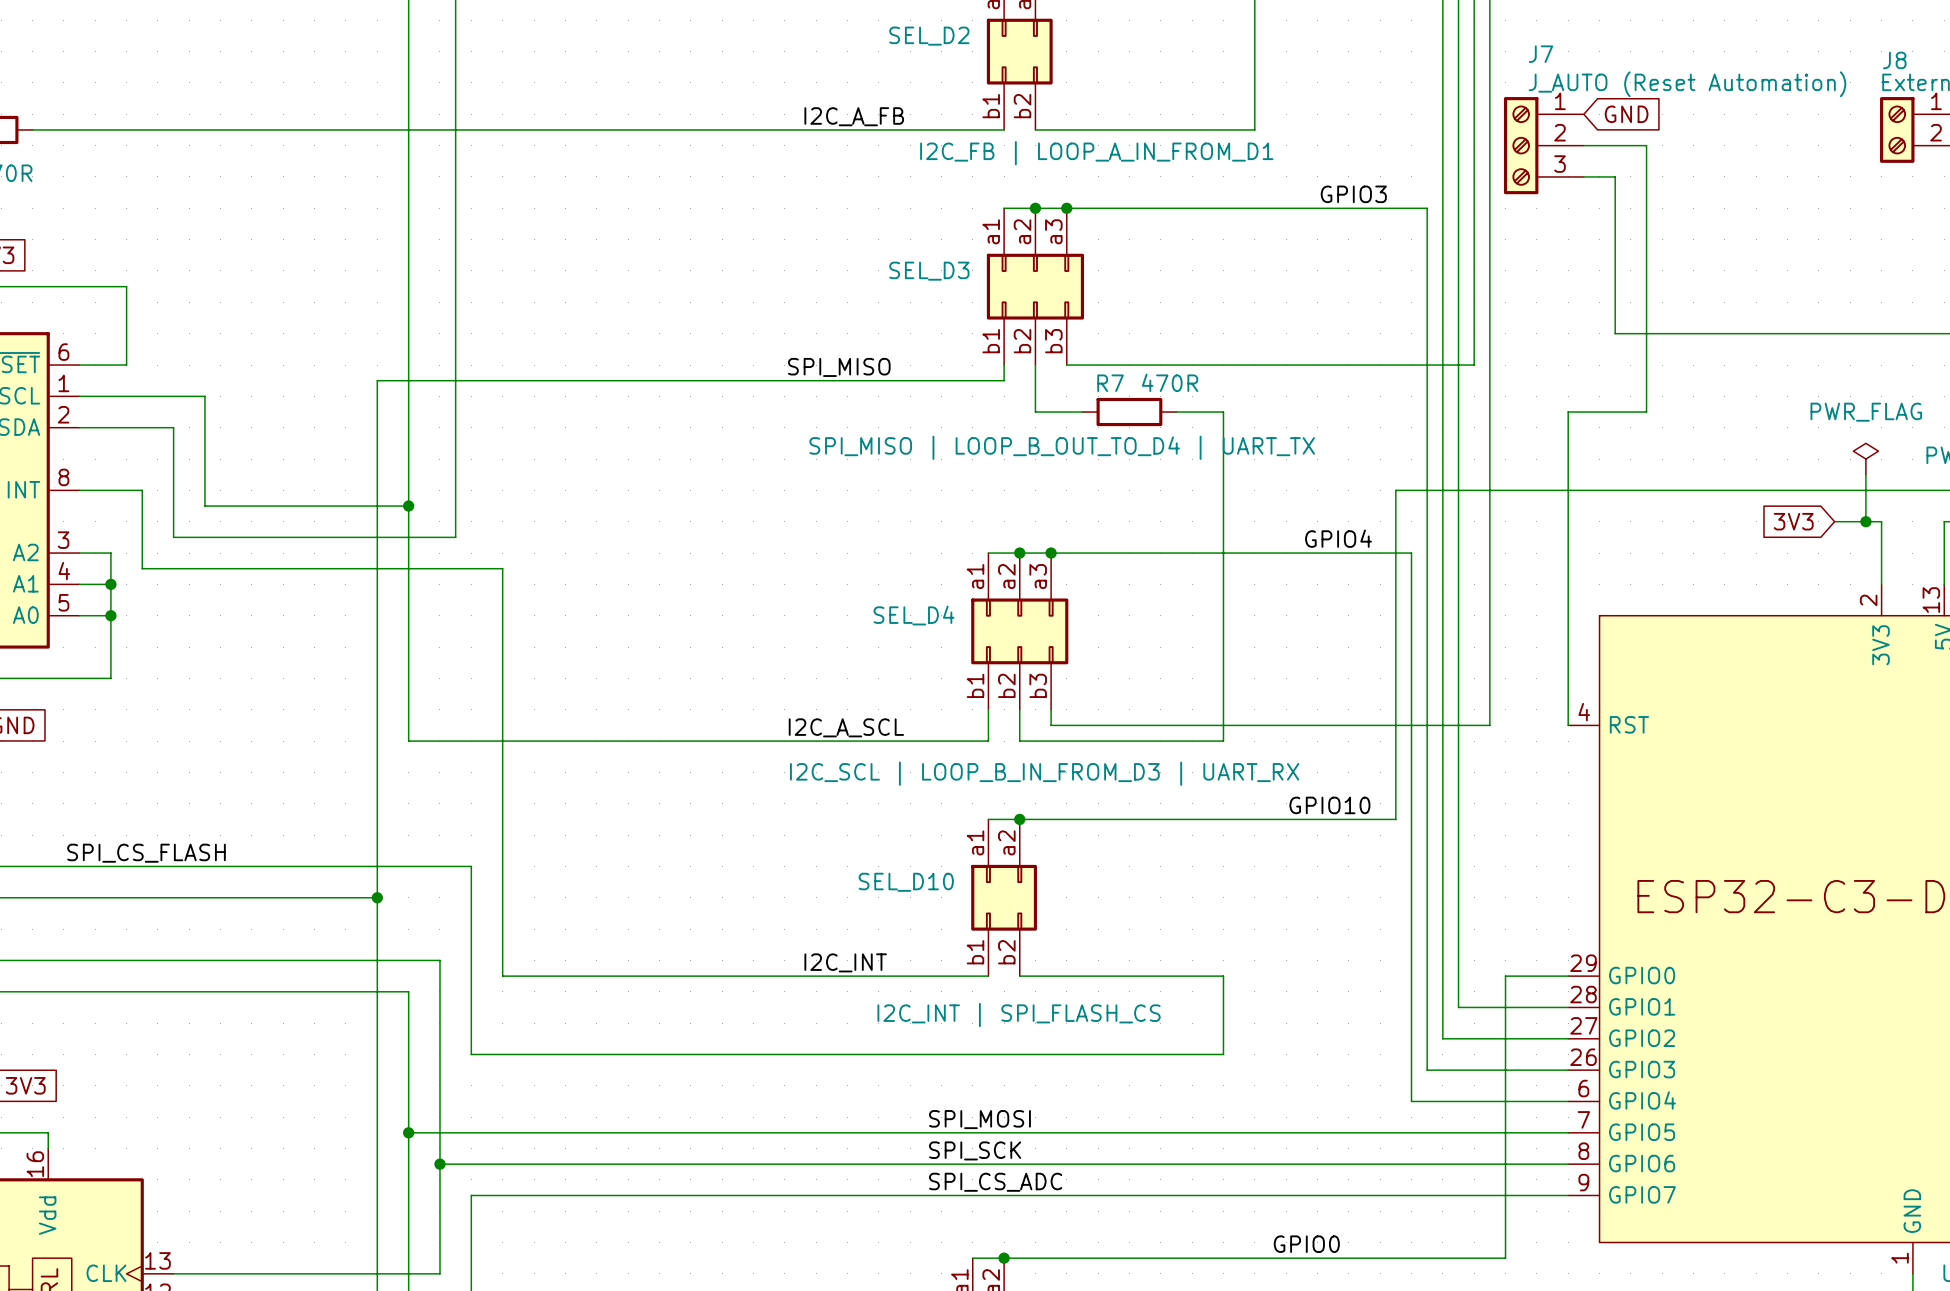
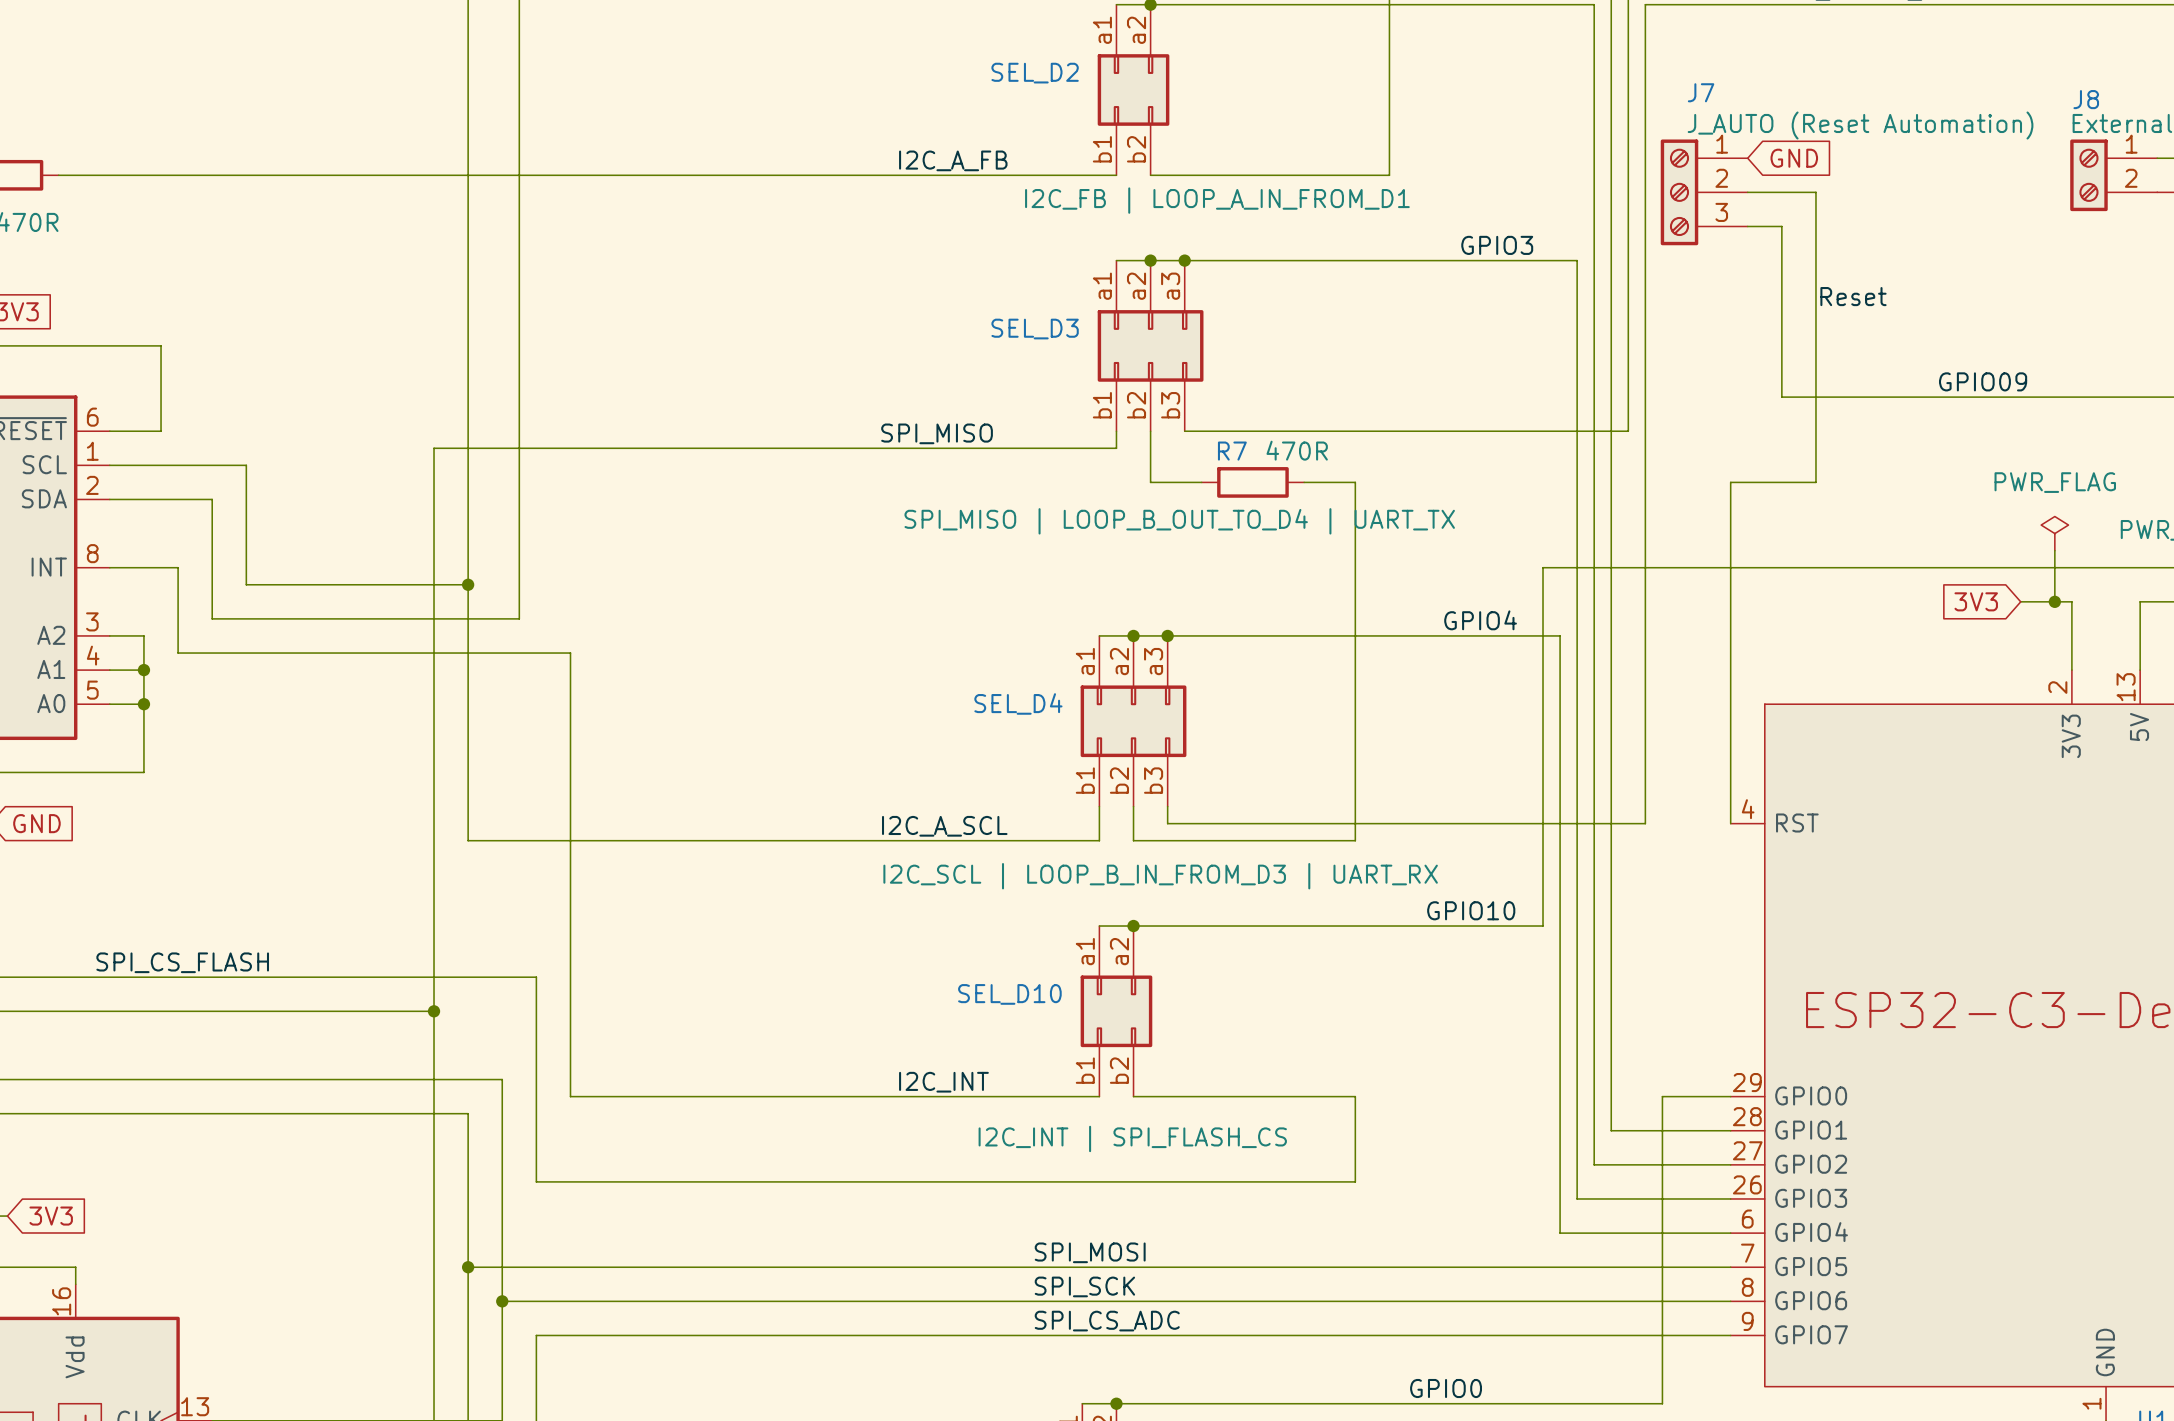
label: none -> Reset (1853, 296)
label: none -> GPIO09 (1983, 381)

